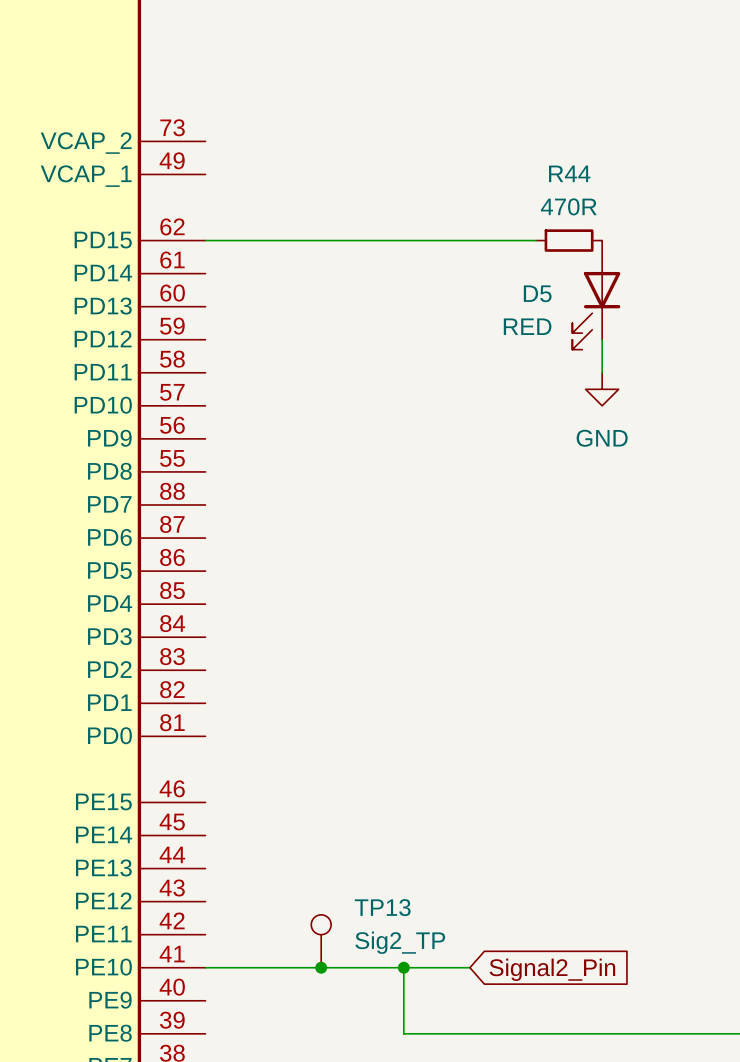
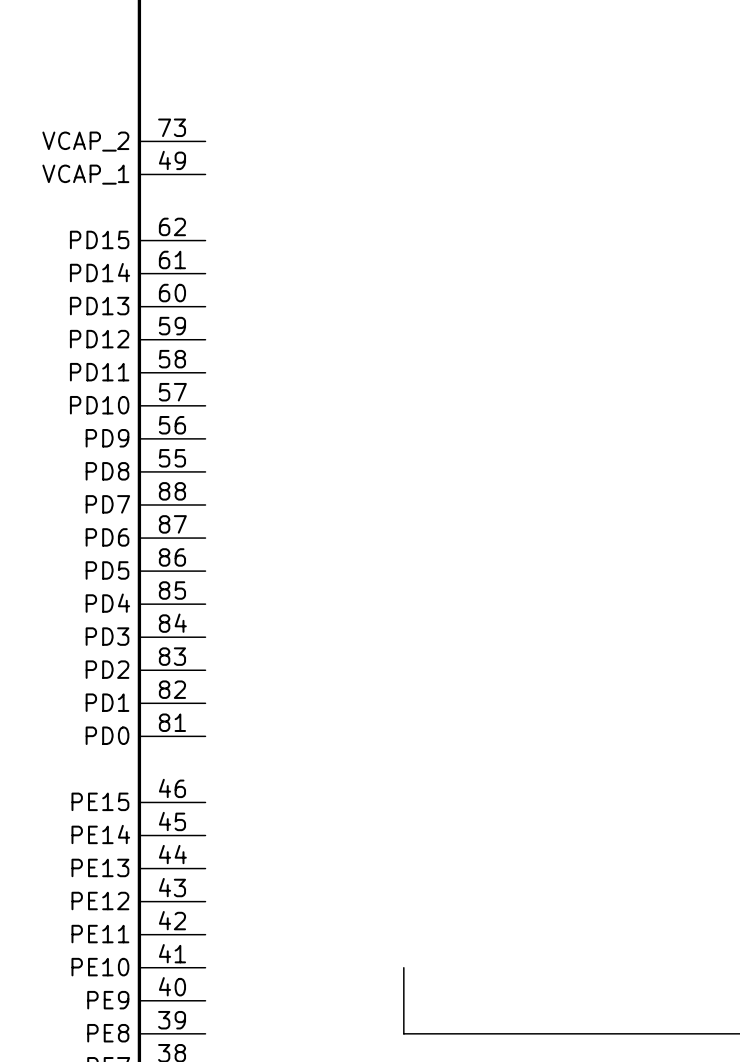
wire: (205, 240) (536, 240) -> none
R44: 470R (569, 240) -> none
D5: RED (596, 295) -> none
wire: (602, 339) (602, 372) -> none
power symbol: GND (602, 389) -> none
TP13: Sig2_TP (321, 941) -> none
wire: (205, 967) (469, 967) -> none
junction: (321, 967) -> none
junction: (403, 967) -> none
global label: Signal2_Pin (552, 969) -> none

